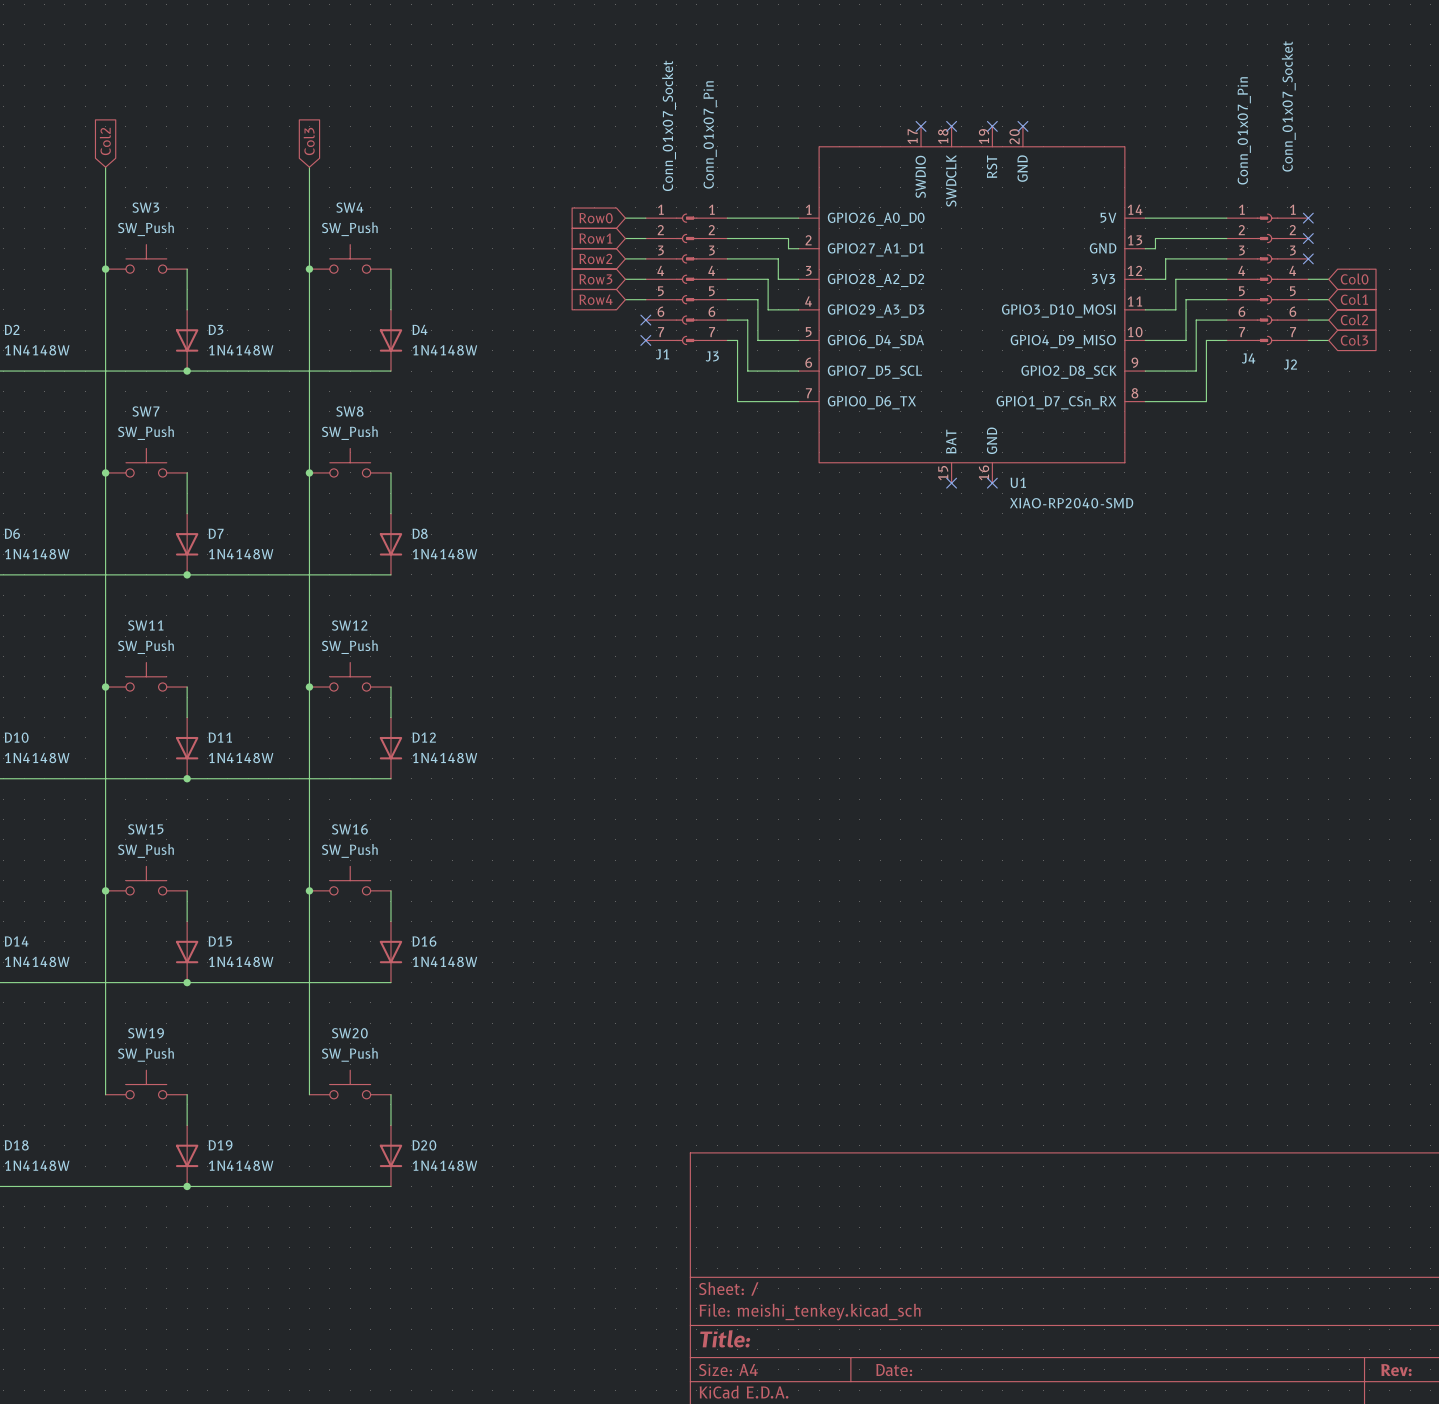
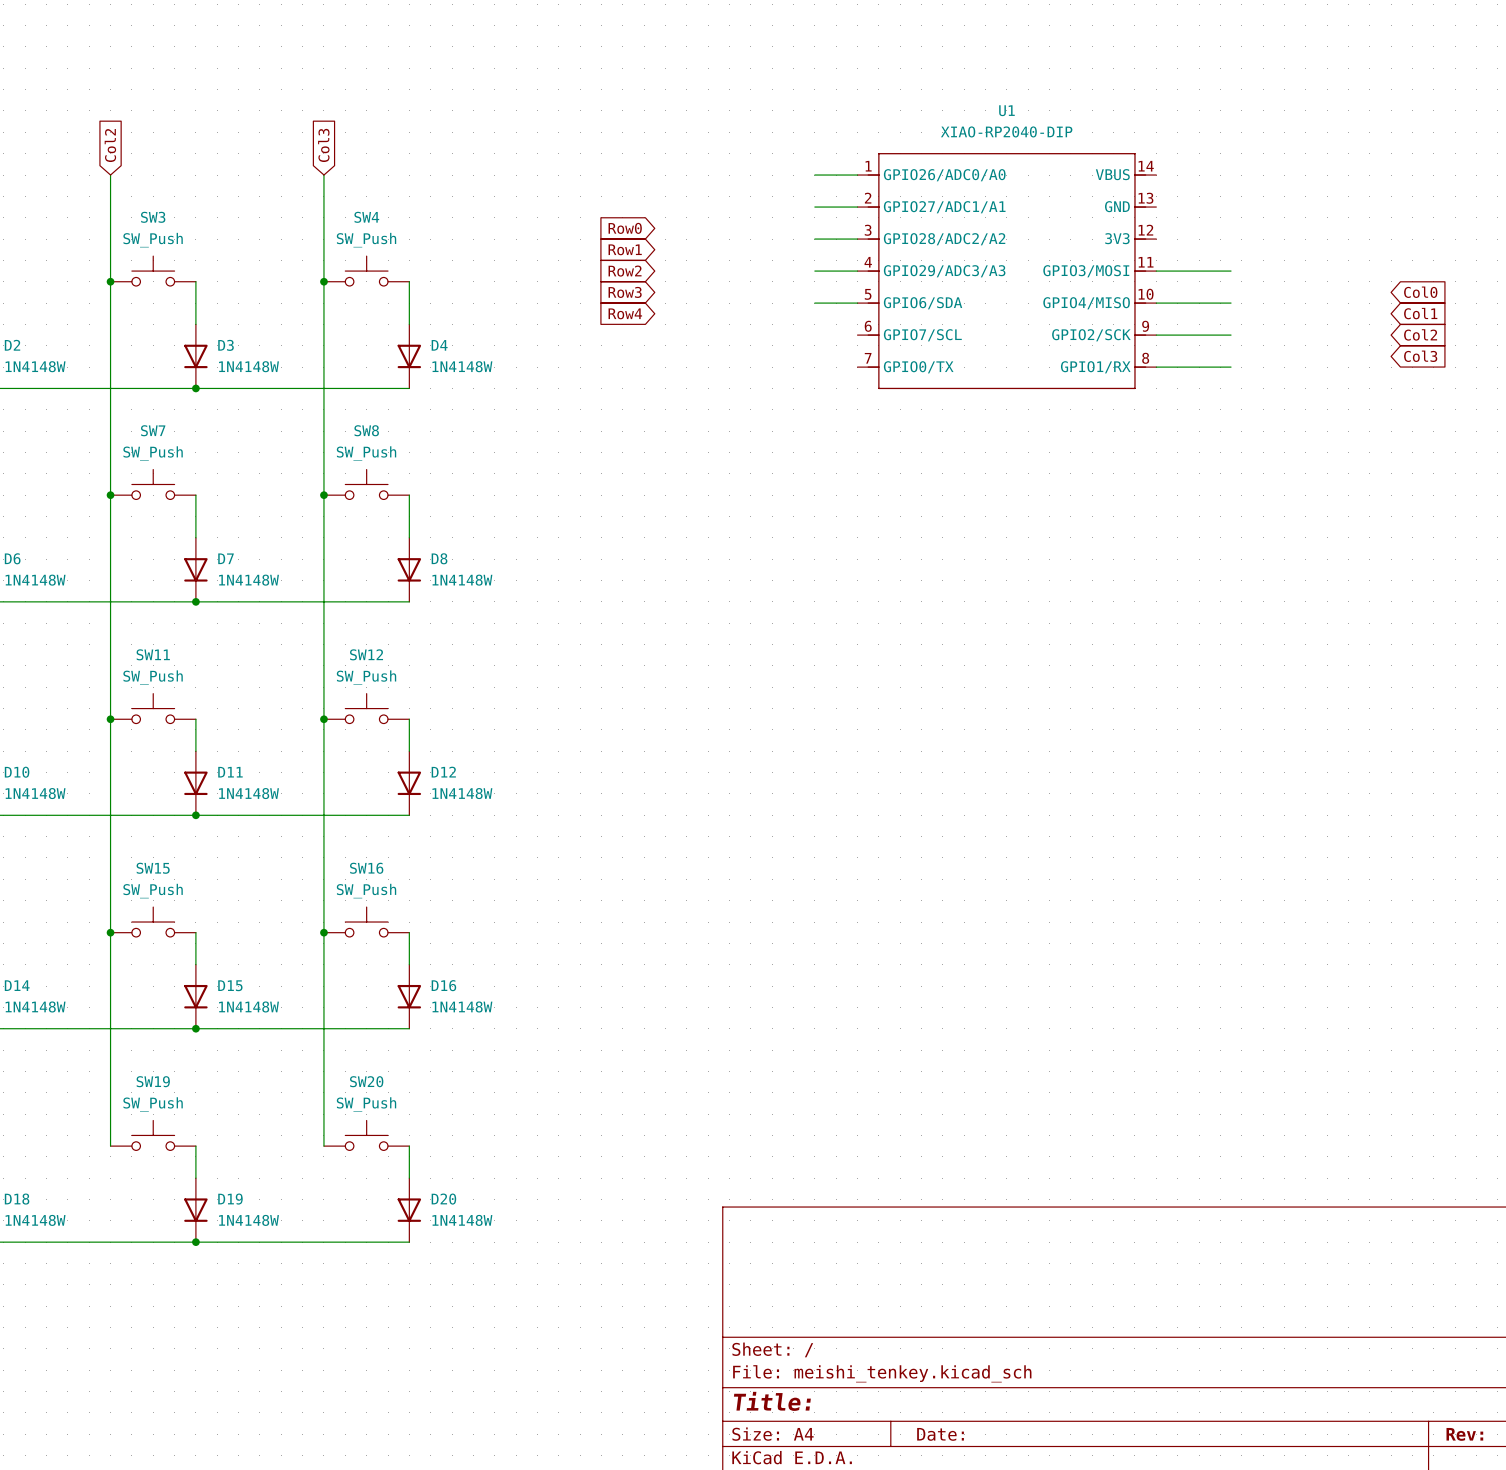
U1 symbol: [798, 126, 1146, 484] -> [857, 153, 1157, 390]
no-connect mark: (921, 126) -> none
no-connect mark: (951, 126) -> none
no-connect mark: (992, 126) -> none
no-connect mark: (1022, 126) -> none
wire: none -> (814, 175) (857, 175)
wire: none -> (814, 207) (857, 207)
wire: (625, 218) (645, 218) -> none
wire: (727, 218) (798, 218) -> none
wire: (1145, 218) (1226, 218) -> none
no-connect mark: (1308, 218) -> none
wire: none -> (814, 239) (857, 239)
wire: (625, 238) (645, 238) -> none
wire: (727, 238) (788, 238) (788, 248) (798, 248) -> none
wire: (1226, 238) (1155, 238) (1155, 248) (1145, 248) -> none
no-connect mark: (1308, 238) -> none
wire: (625, 258) (645, 258) -> none
wire: (727, 258) (778, 258) (778, 279) (798, 279) -> none
wire: none -> (814, 271) (857, 271)
wire: (1165, 258) (1165, 279) (1145, 279) -> (1220, 271) (1156, 271)
wire: (1175, 258) (1226, 258) -> none
no-connect mark: (1308, 258) -> none
wire: (625, 279) (645, 279) -> none
J1: Conn_01x07_Socket (666, 279) -> none
J3: Conn_01x07_Pin (706, 279) -> none
wire: (727, 279) (768, 279) (768, 309) (798, 309) -> none
wire: (1226, 279) (1175, 279) (1175, 309) (1145, 309) -> none
J4: Conn_01x07_Pin (1247, 279) -> none
J2: Conn_01x07_Socket (1287, 279) -> none
wire: (1308, 279) (1328, 279) -> none
wire: none -> (814, 303) (857, 303)
wire: none -> (1156, 303) (1231, 303)
wire: (625, 299) (645, 299) -> none
wire: (727, 299) (757, 299) (757, 340) (798, 340) -> none
wire: (1226, 299) (1186, 299) (1186, 340) (1145, 340) -> none
wire: (1308, 299) (1328, 299) -> none
no-connect mark: (645, 320) -> none
wire: (727, 320) (747, 320) (747, 371) (798, 371) -> none
wire: none -> (1156, 335) (1231, 335)
wire: (1226, 320) (1196, 320) (1196, 371) (1145, 371) -> none
wire: (1308, 320) (1328, 320) -> none
no-connect mark: (645, 340) -> none
wire: (727, 340) (737, 340) (737, 401) (798, 401) -> none
wire: (1226, 340) (1206, 340) (1206, 401) (1145, 401) -> none
wire: (1308, 340) (1328, 340) -> none
wire: none -> (1156, 367) (1231, 367)
U1 name position: U1 (1018, 482) -> U1 (1006, 110)
no-connect mark: (951, 483) -> none
no-connect mark: (992, 483) -> none
U1 value: XIAO-RP2040-SMD (1071, 503) -> XIAO-RP2040-DIP (1006, 131)

